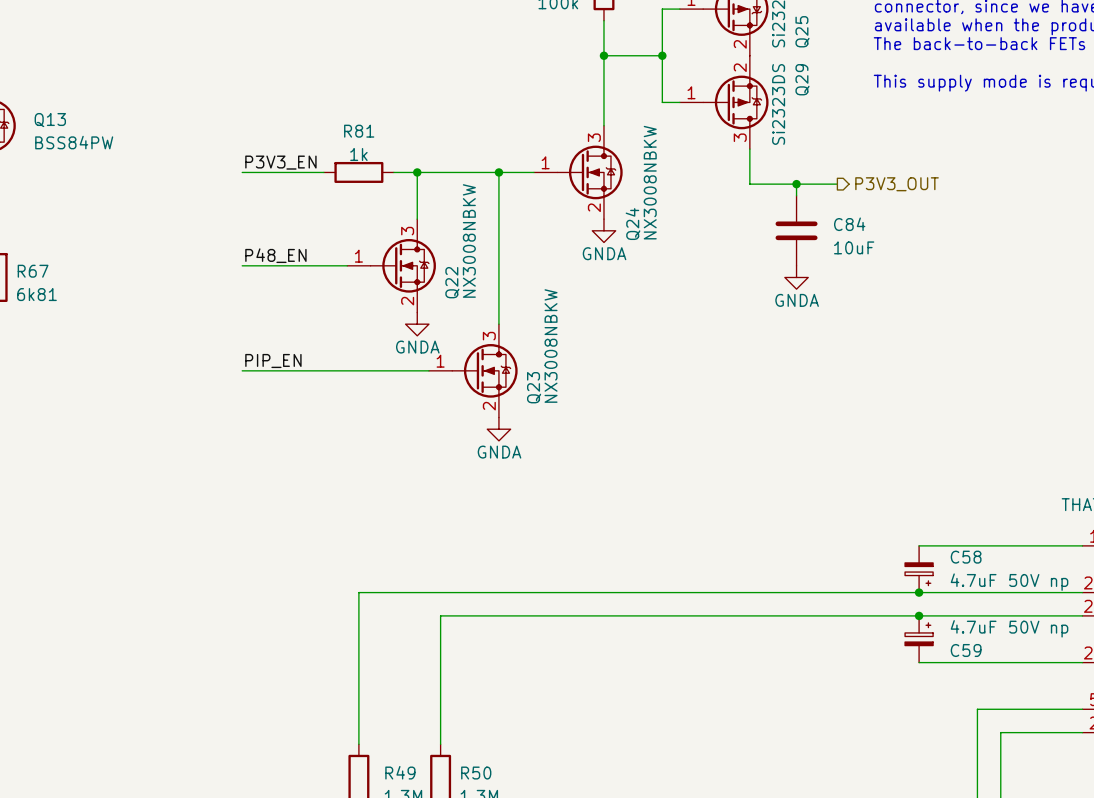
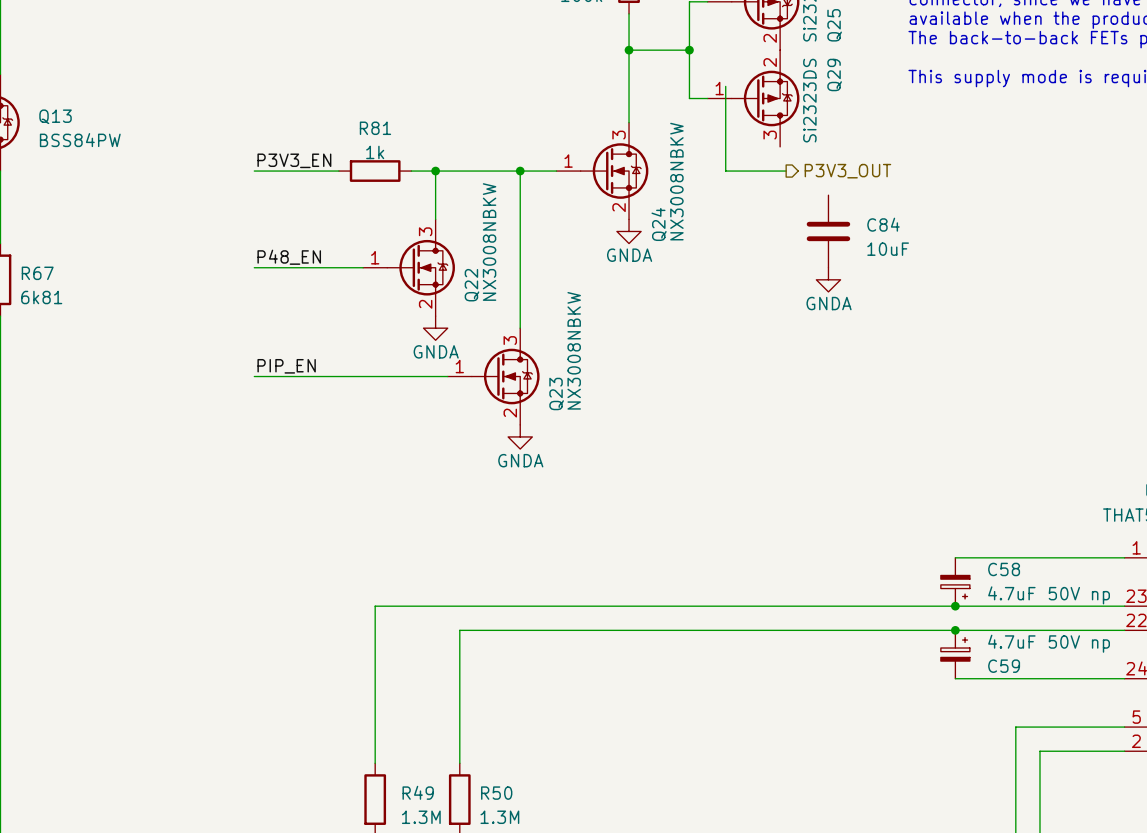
wire: none -> (725, 86) (725, 171) (786, 171)
wire: (749, 149) (749, 184) (837, 184) -> none
wire: (796, 184) (796, 195) -> none
junction: (796, 184) -> none
hierarchical label position: P3V3_OUT (897, 184) -> P3V3_OUT (847, 171)

